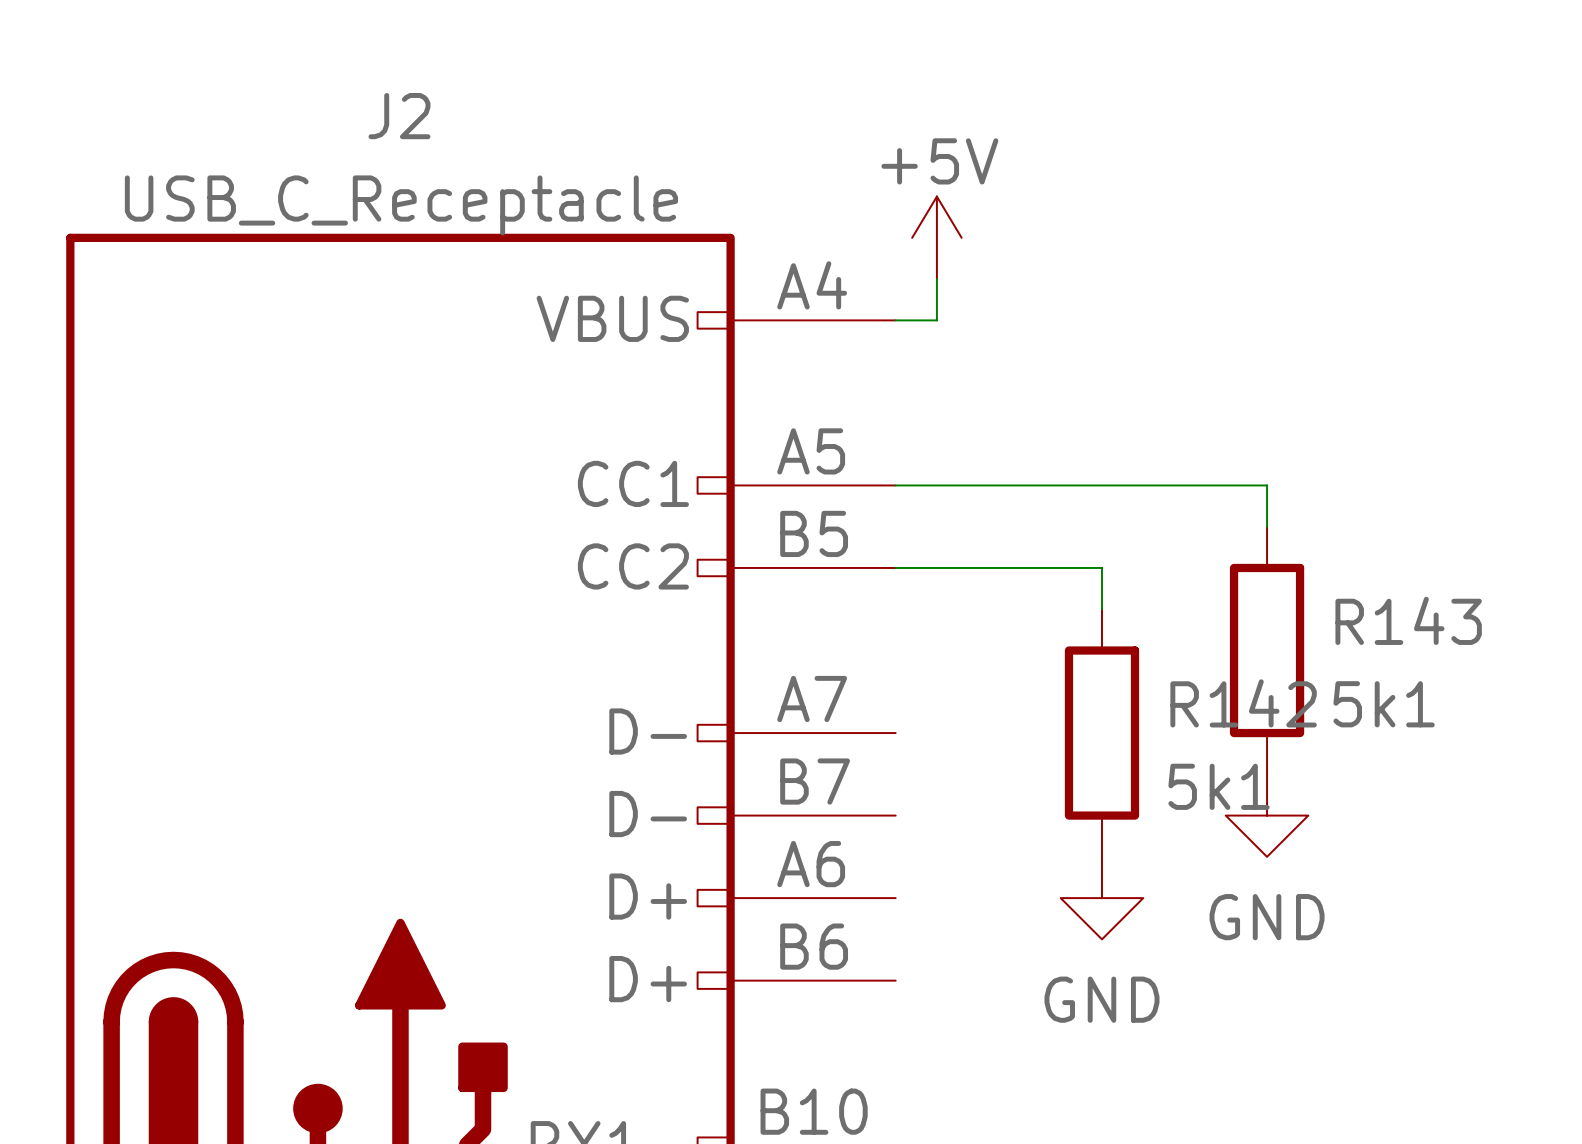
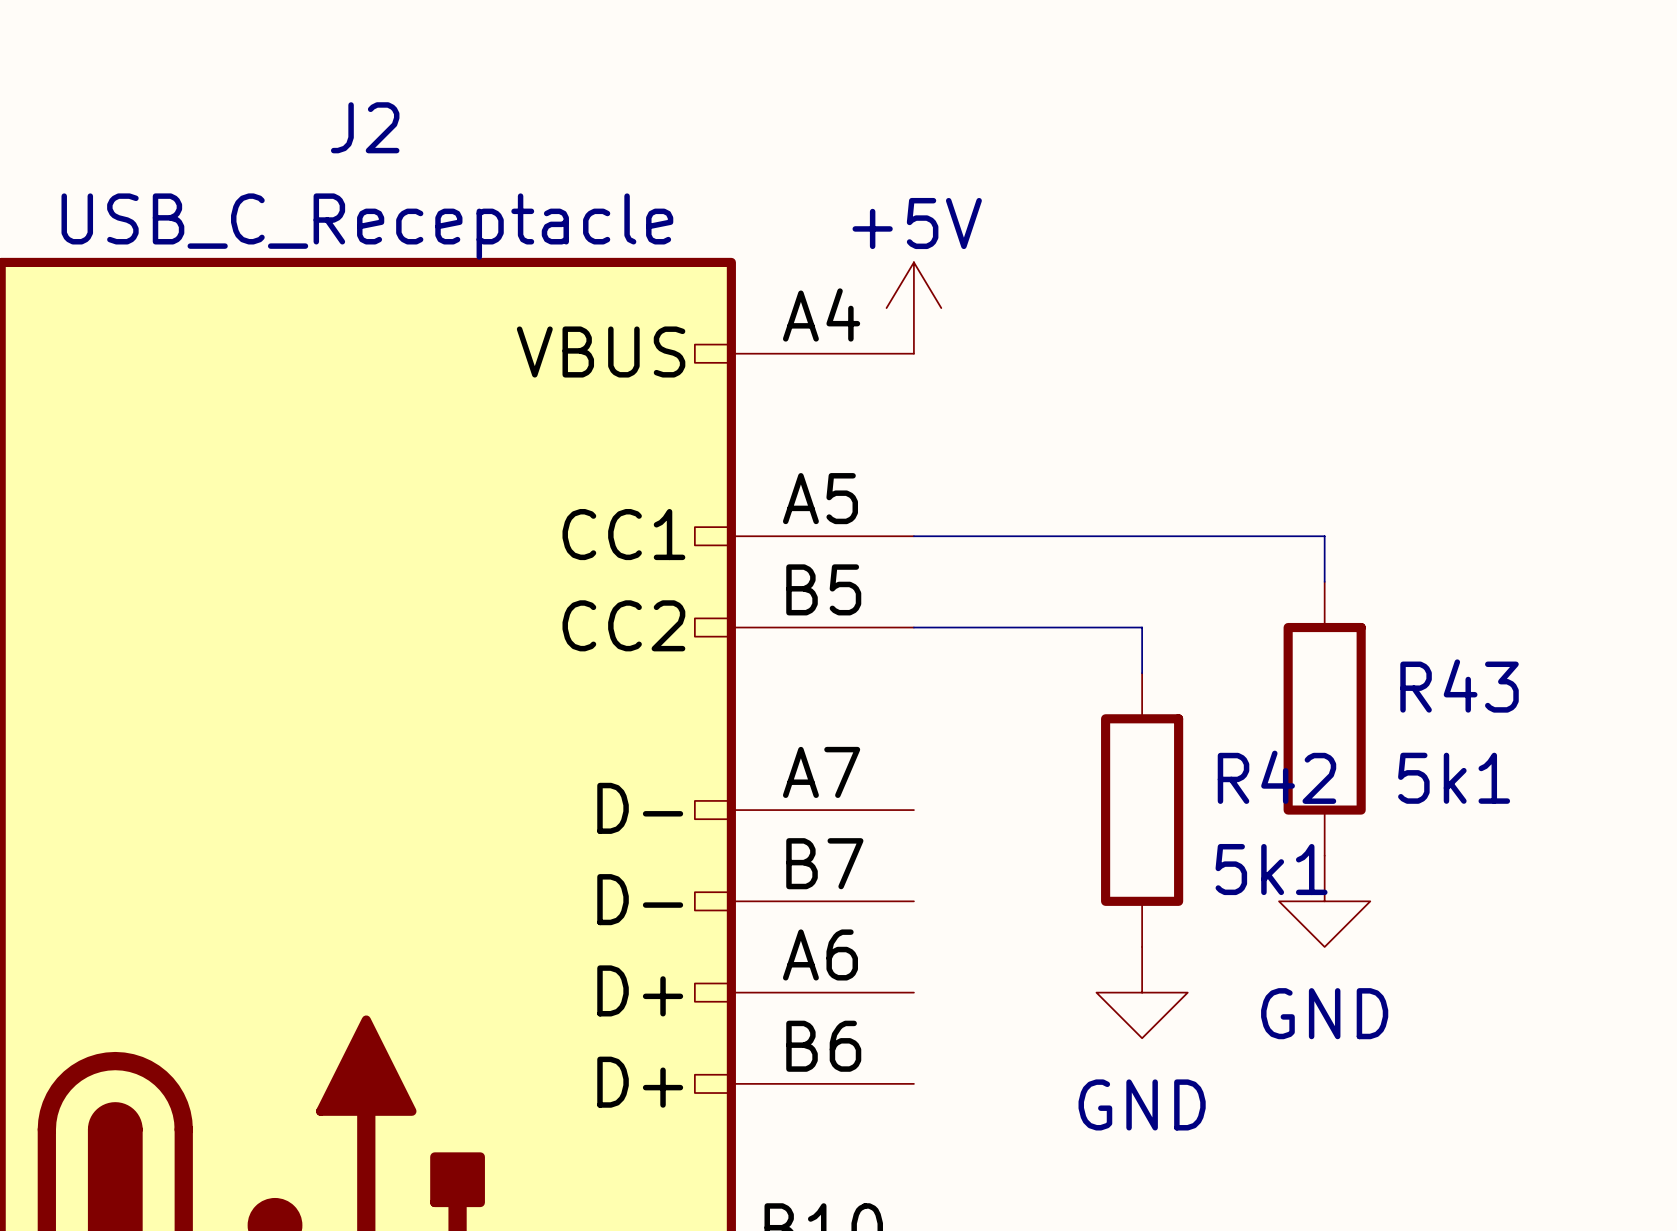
power symbol position: +5V (936, 237) -> +5V (913, 308)
wire: (936, 279) (936, 320) (895, 320) -> none
R143 name: R143 (1408, 620) -> R43 (1459, 686)
R142 name: R142 (1243, 703) -> R42 (1276, 777)

